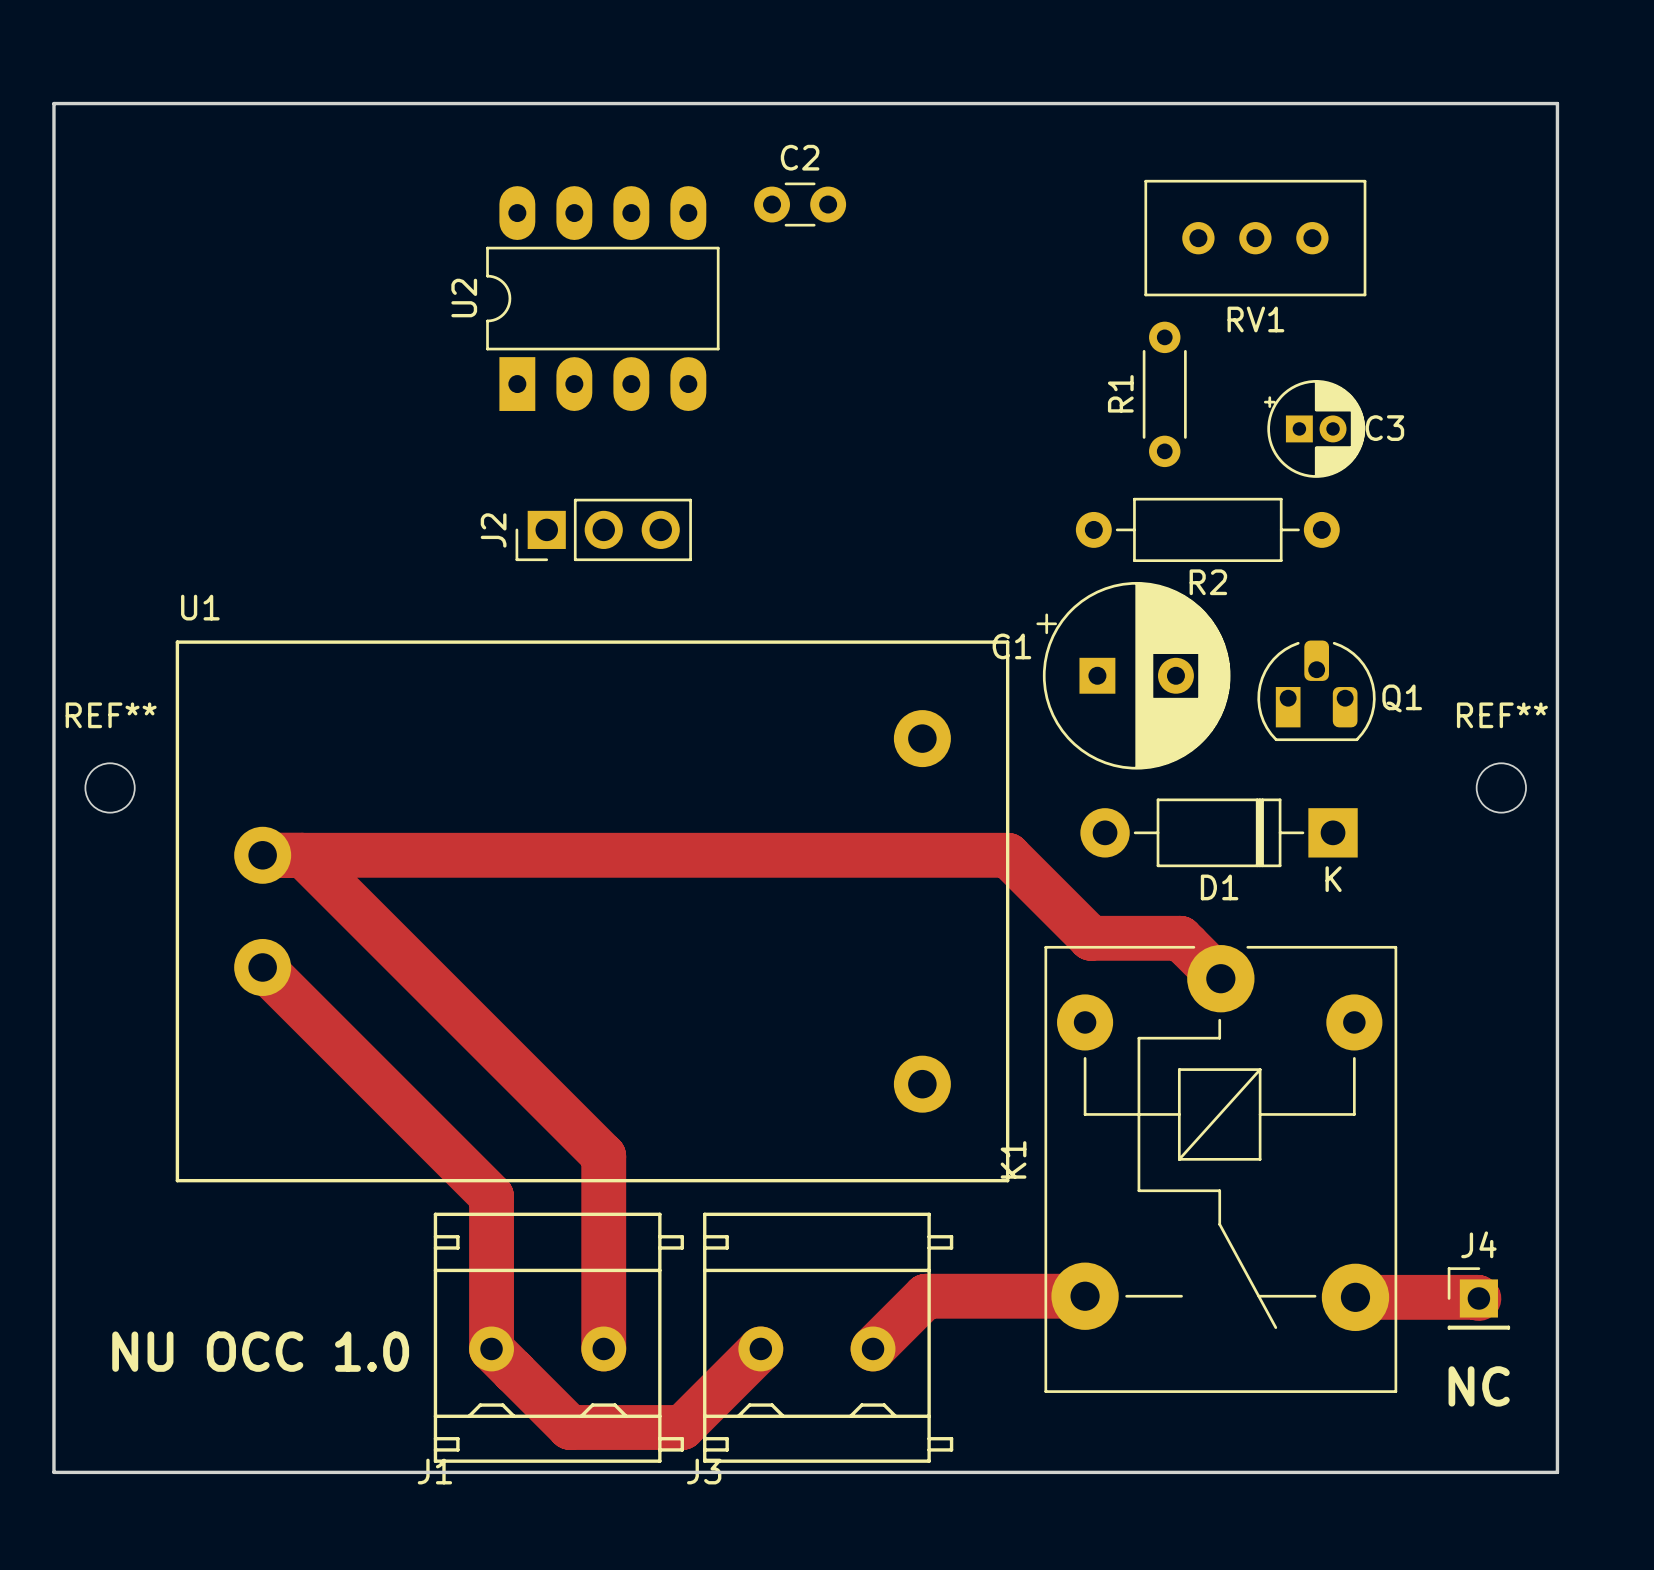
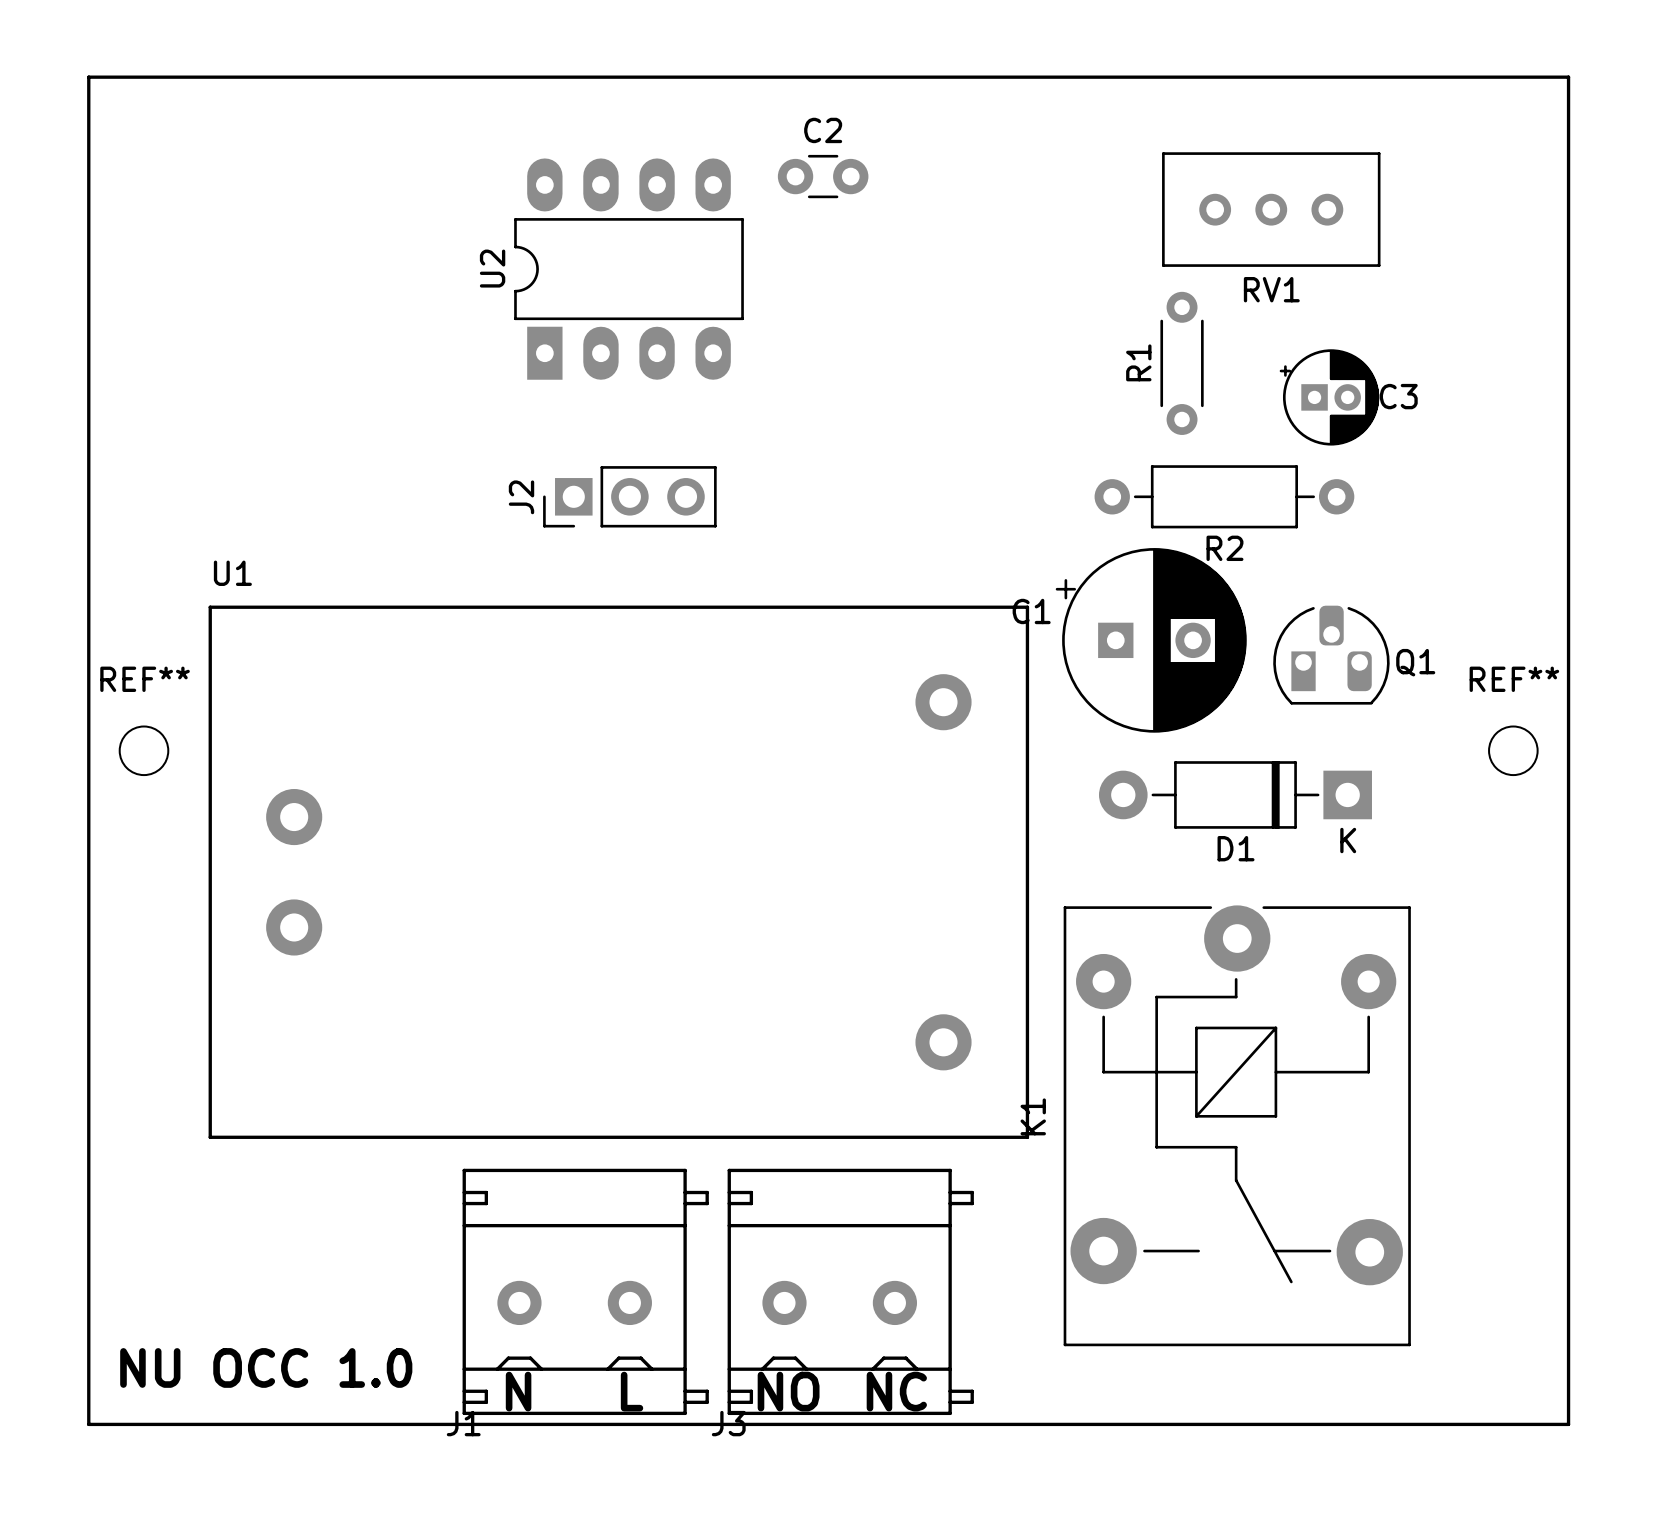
track: (262, 855) (1007, 855) (1090, 938) (1180, 938) (1220, 978) -> none
track: (302, 855) (603, 1156) (603, 1348) -> none
track: (262, 967) (491, 1196) (491, 1348) (570, 1427) (682, 1427) (760, 1348) -> none
track: (1085, 1296) (925, 1296) (873, 1348) -> none
track: (1355, 1297) (1478, 1298) -> none
J4: (1478, 1298) -> none
text position: NU OCC 1.0 (260, 1351) -> NU OCC 1.0 (266, 1367)
text: NC (1479, 1386) -> none
text: none -> N (518, 1391)
text: none -> L (632, 1391)
text: none -> NO (788, 1391)
text: none -> NC (896, 1391)

